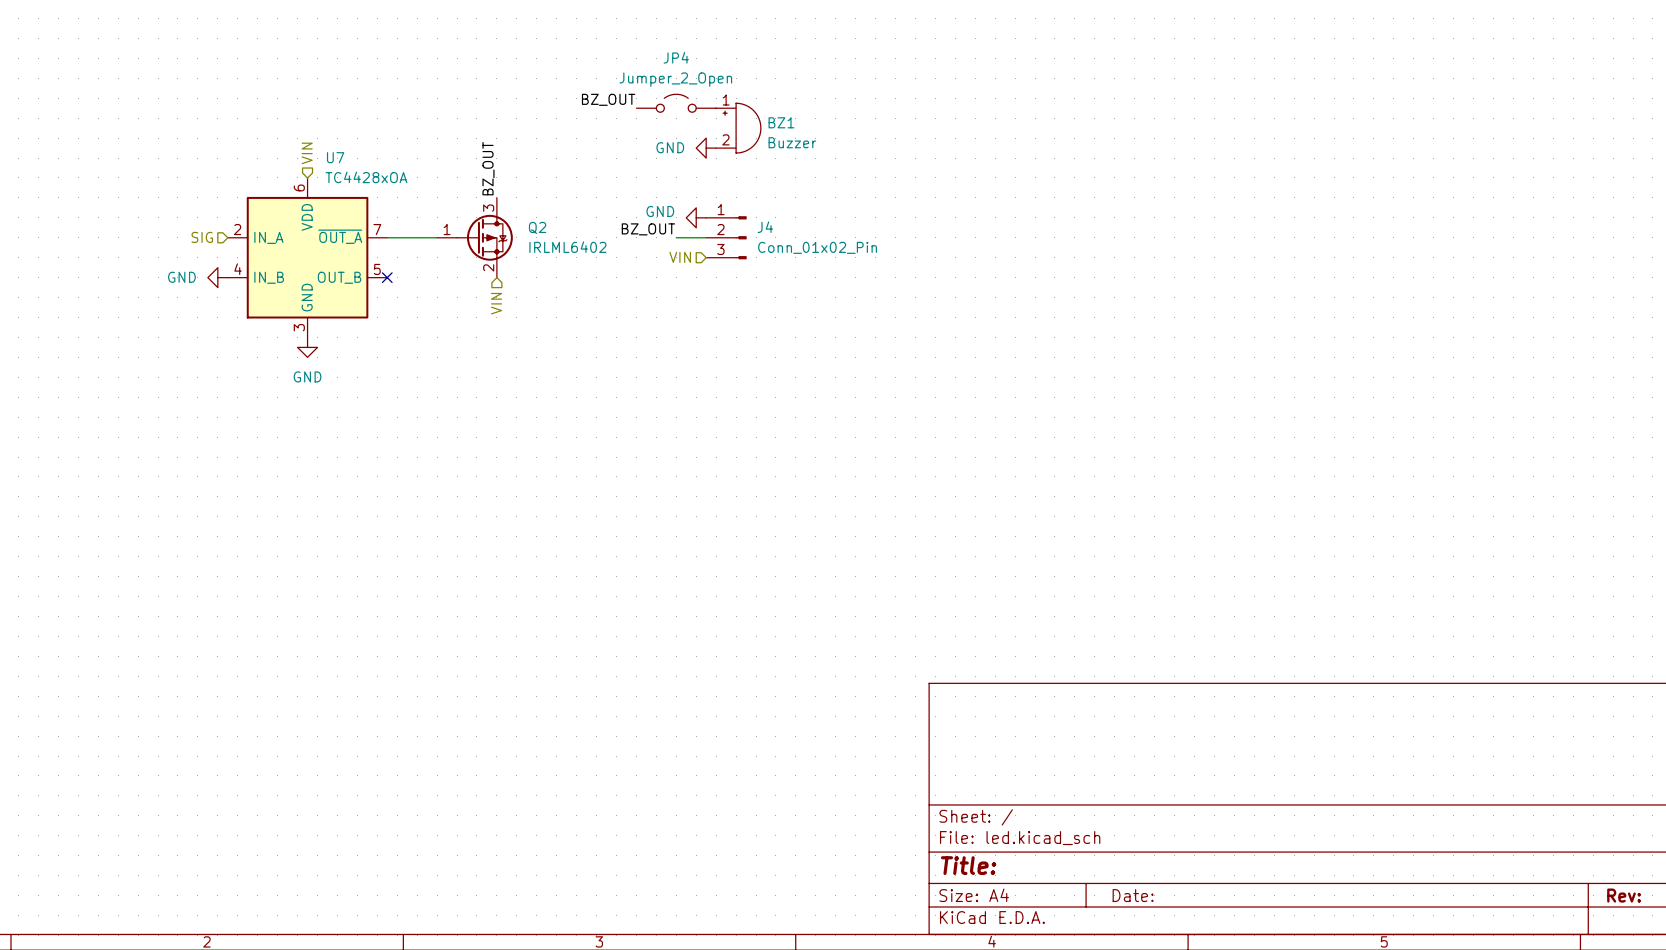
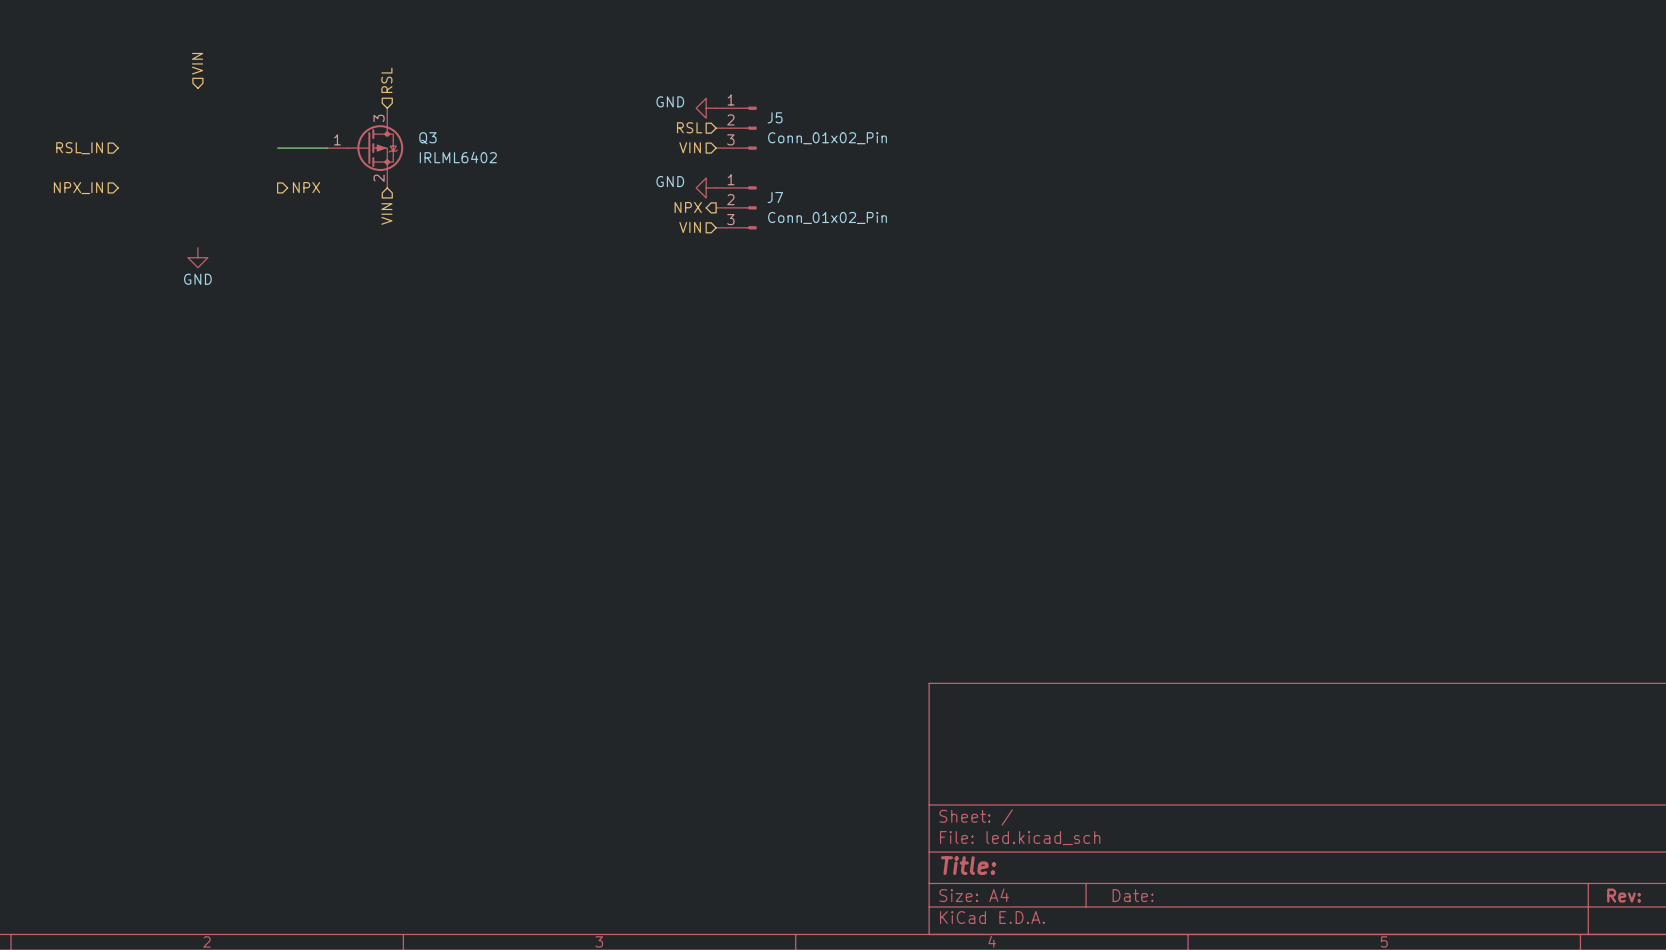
hierarchical label: none -> VIN (197, 63)
hierarchical label: none -> RSL (386, 80)
label: BZ_OUT (608, 99) -> none
JP4: Jumper_2_Open (676, 103) -> none
power symbol: none -> GND (706, 108)
hierarchical label: none -> RSL (689, 127)
J5: none -> Conn_01x02_Pin (736, 128)
BZ1: Buzzer (738, 128) -> none
hierarchical label: none -> VIN (690, 147)
hierarchical label: none -> RSL_IN (79, 148)
Q3: none -> IRLML6402 (365, 148)
power symbol: GND (706, 148) -> none
hierarchical label: VIN (307, 153) -> none
label: BZ_OUT (488, 168) -> none
hierarchical label: none -> NPX (306, 187)
power symbol: none -> GND (706, 187)
hierarchical label: none -> NPX_IN (78, 188)
hierarchical label: none -> NPX (688, 207)
J7: none -> Conn_01x02_Pin (736, 207)
hierarchical label: none -> VIN (386, 213)
power symbol: GND (696, 217) -> none
label: BZ_OUT (648, 229) -> none
hierarchical label: SIG (202, 237) -> none
wire: (387, 237) (437, 237) -> (277, 148) (327, 148)
Q2: IRLML6402 (474, 237) -> none
wire: (676, 237) (706, 237) -> none
J4: Conn_01x02_Pin (726, 237) -> none
U7: TC4428xOA (307, 257) -> none
hierarchical label position: VIN (680, 257) -> VIN (690, 227)
power symbol text position: GND (181, 277) -> GND (197, 279)
power symbol rotation: 0° (217, 277) -> 90° counterclockwise (197, 257)
power symbol position: GND (217, 277) -> GND (197, 257)
no-connect mark: (387, 277) -> none
hierarchical label: VIN (496, 303) -> none
power symbol: GND (307, 347) -> none

